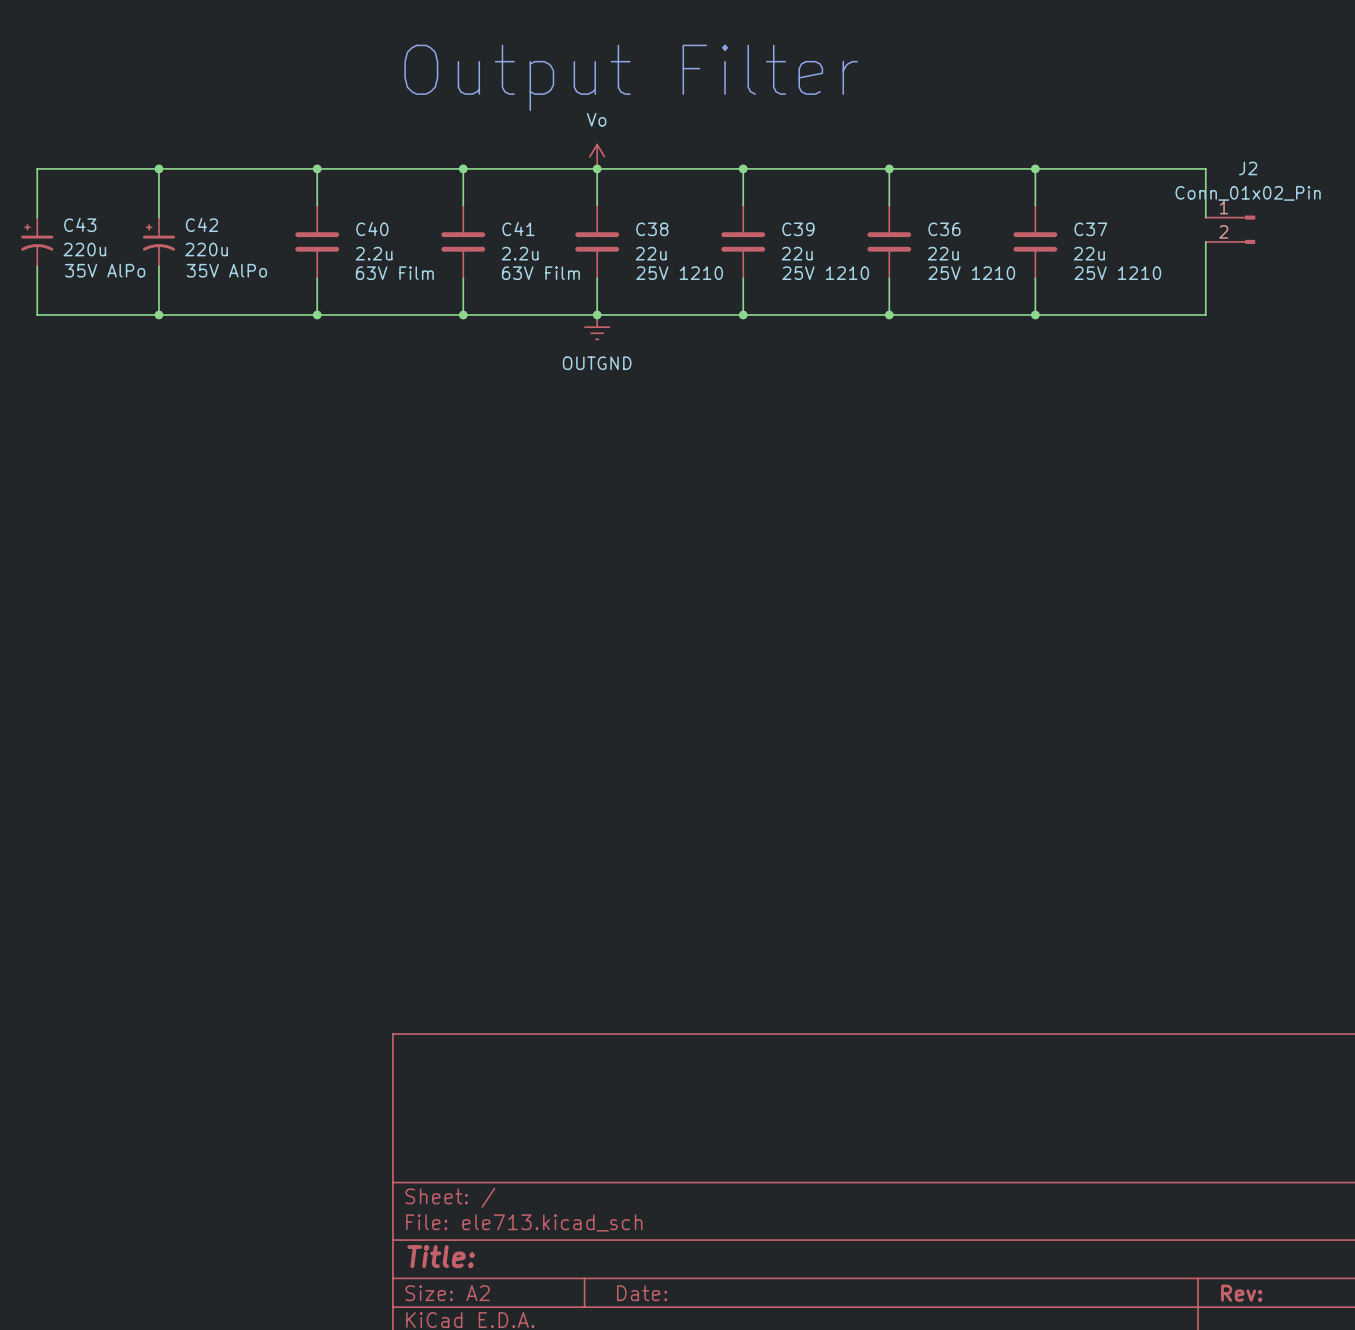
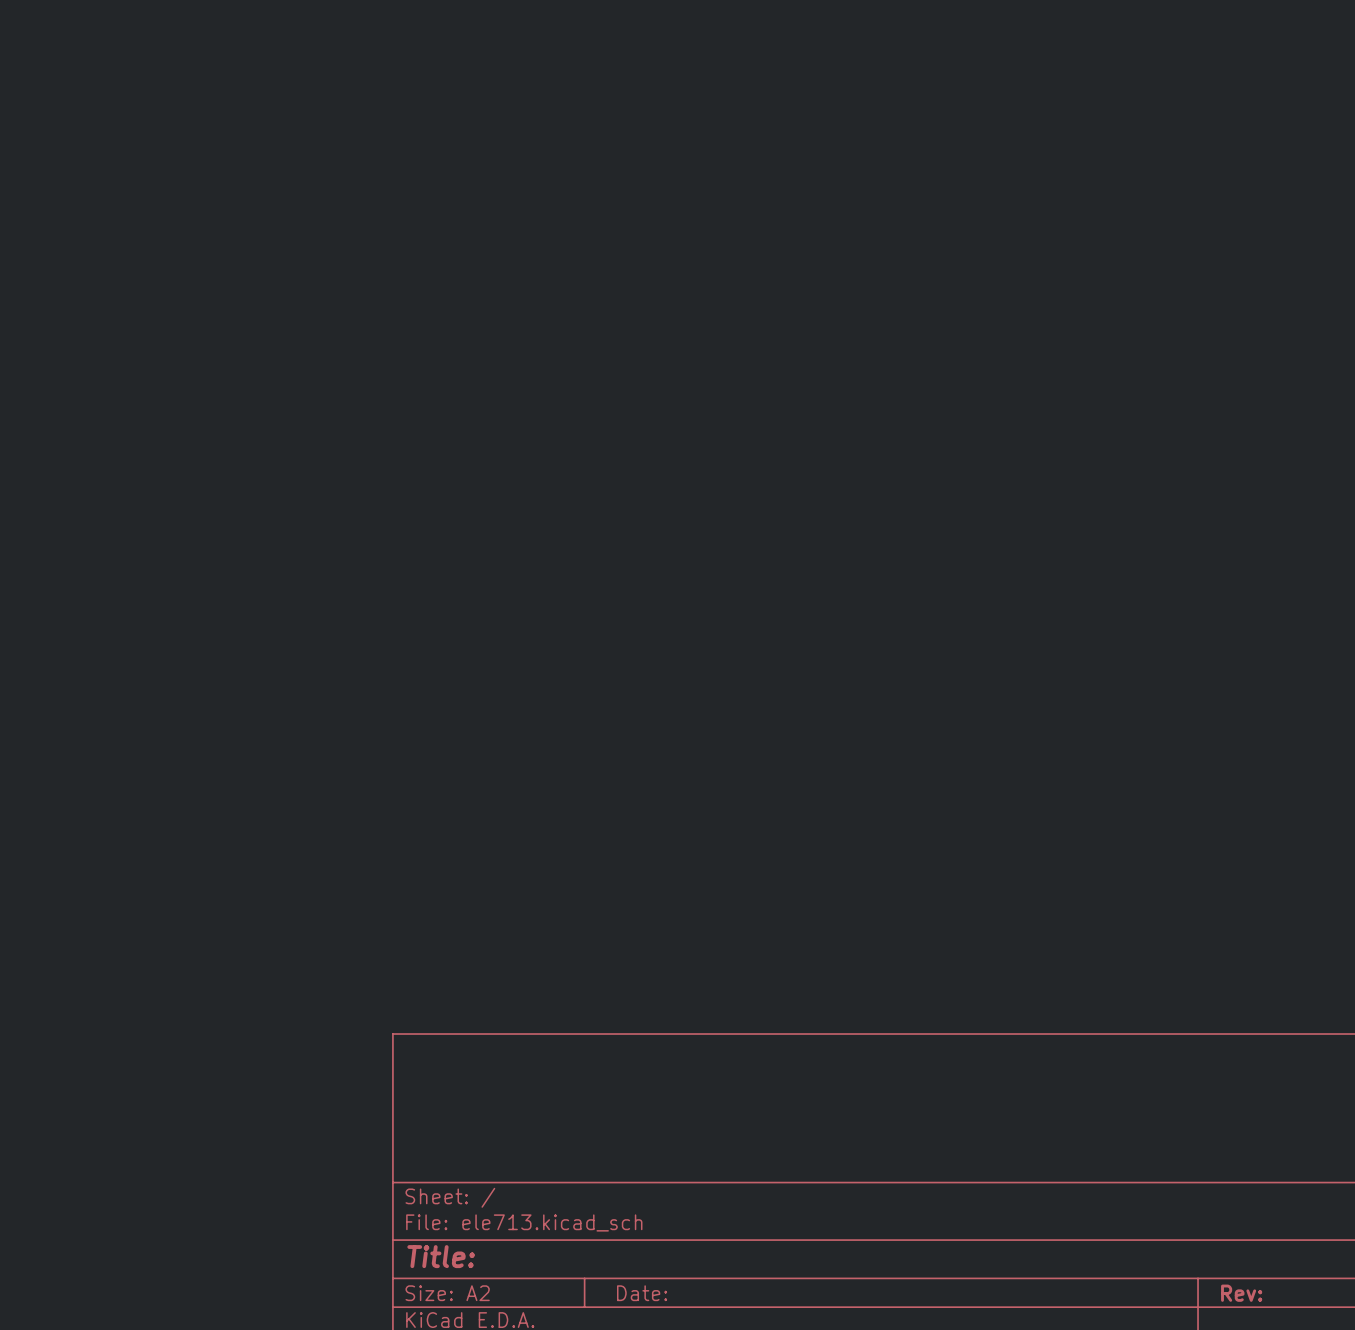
text: Output Filter (631, 77) -> none
power symbol: Vo (597, 156) -> none
wire: (158, 168) (158, 217) -> none
junction: (158, 168) -> none
wire: (317, 168) (317, 205) -> none
junction: (317, 168) -> none
wire: (463, 168) (463, 205) -> none
junction: (463, 168) -> none
wire: (597, 168) (597, 205) -> none
junction: (597, 168) -> none
wire: (743, 168) (743, 205) -> none
junction: (743, 168) -> none
wire: (889, 168) (889, 205) -> none
junction: (889, 168) -> none
wire: (1035, 168) (1035, 205) -> none
junction: (1035, 168) -> none
wire: (37, 217) (37, 168) (1205, 168) (1205, 217) -> none
J2: Conn_01x02_Pin (1230, 229) -> none
C43: 220u (37, 241) -> none
C42: 220u (158, 241) -> none
C40: 2.2u (317, 241) -> none
C41: 2.2u (463, 241) -> none
C38: 22u (597, 241) -> none
C39: 22u (743, 241) -> none
C36: 22u (889, 241) -> none
C37: 22u (1035, 241) -> none
wire: (1205, 241) (1205, 314) (37, 314) (37, 266) -> none
wire: (158, 266) (158, 314) -> none
wire: (317, 278) (317, 314) -> none
wire: (463, 278) (463, 314) -> none
wire: (597, 278) (597, 314) -> none
wire: (743, 278) (743, 314) -> none
wire: (889, 278) (889, 314) -> none
wire: (1035, 278) (1035, 314) -> none
junction: (158, 314) -> none
junction: (317, 314) -> none
junction: (463, 314) -> none
junction: (597, 314) -> none
junction: (743, 314) -> none
junction: (889, 314) -> none
junction: (1035, 314) -> none
power symbol: OUTGND (597, 327) -> none

